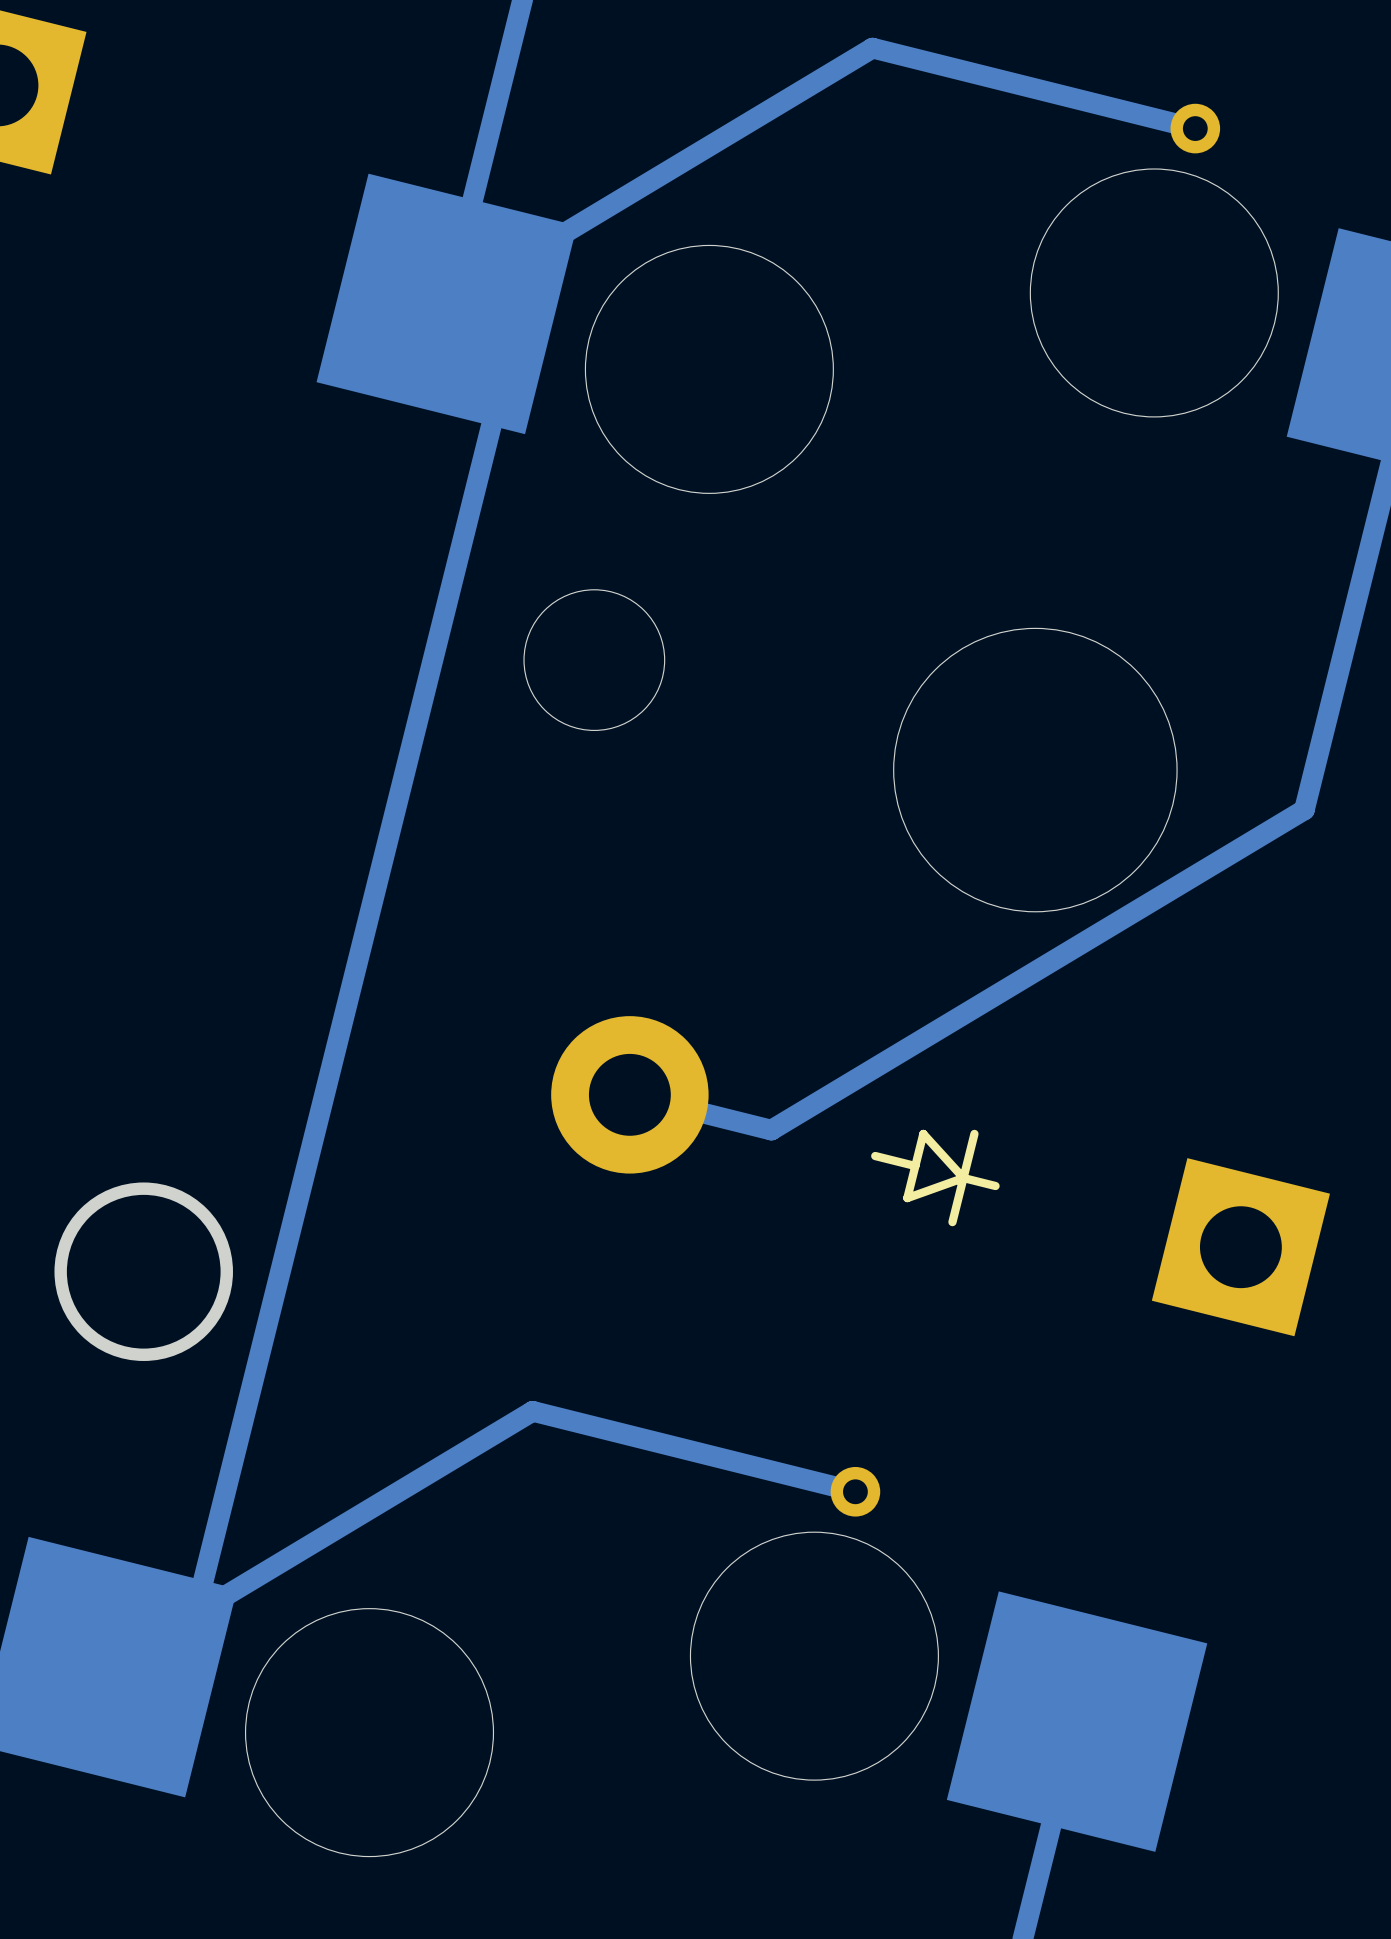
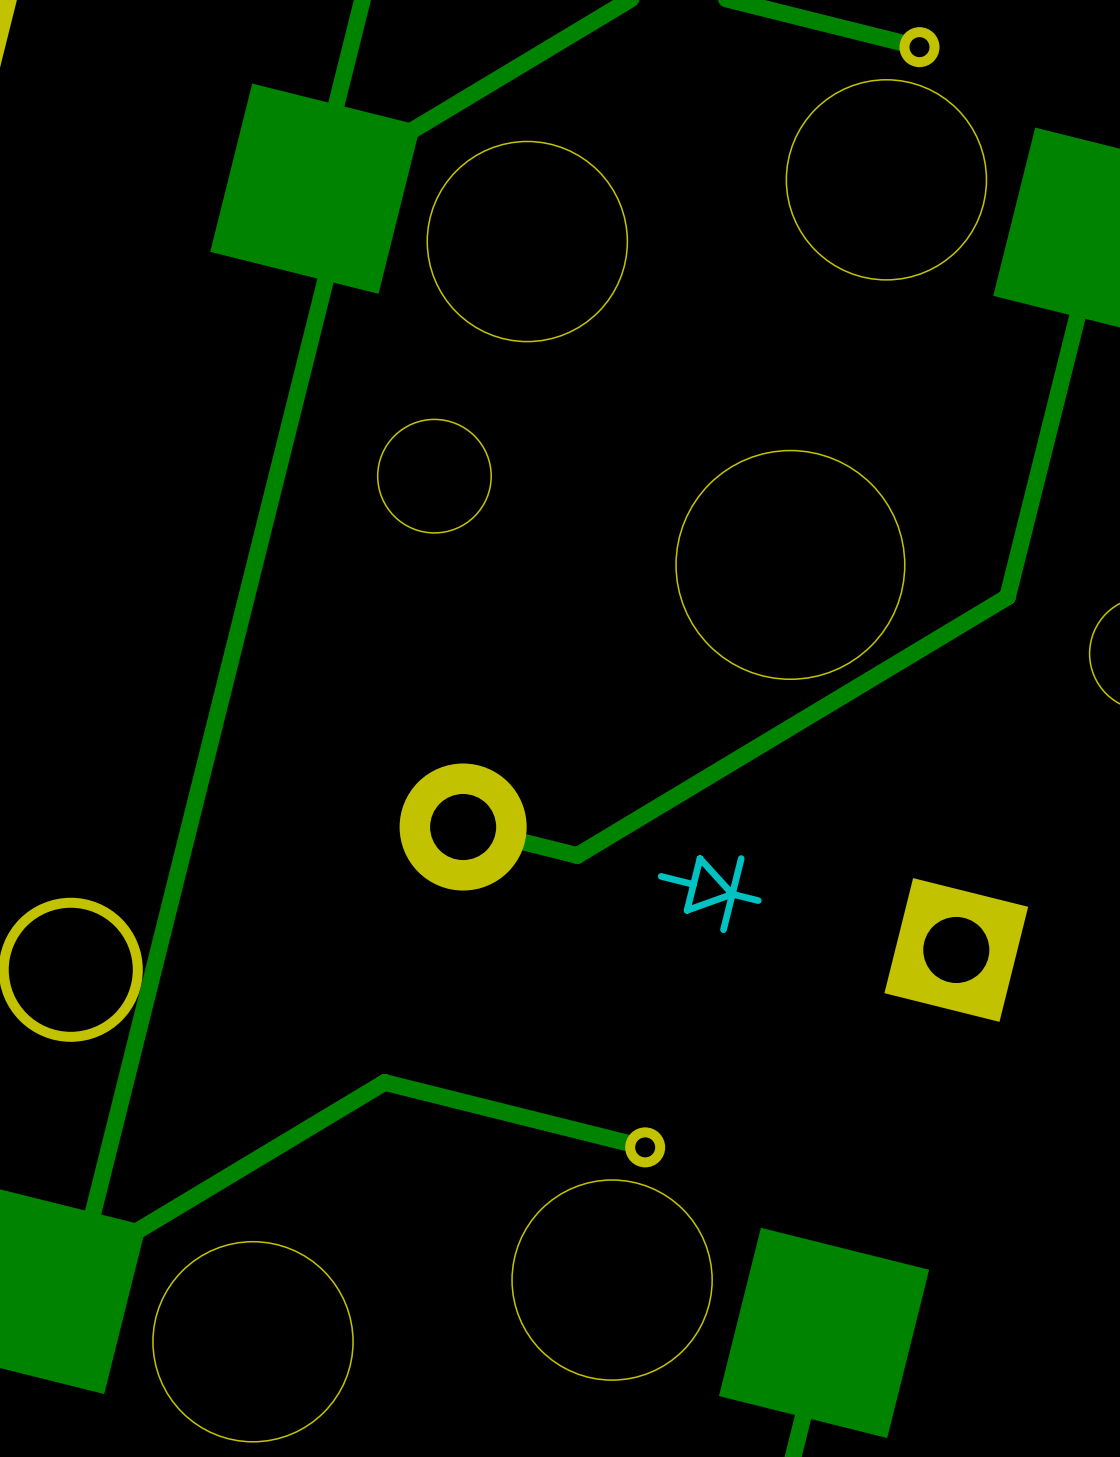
track: (475, 352) (499, 392) (195, 1614) -> (338, 227) (79, 1265)

